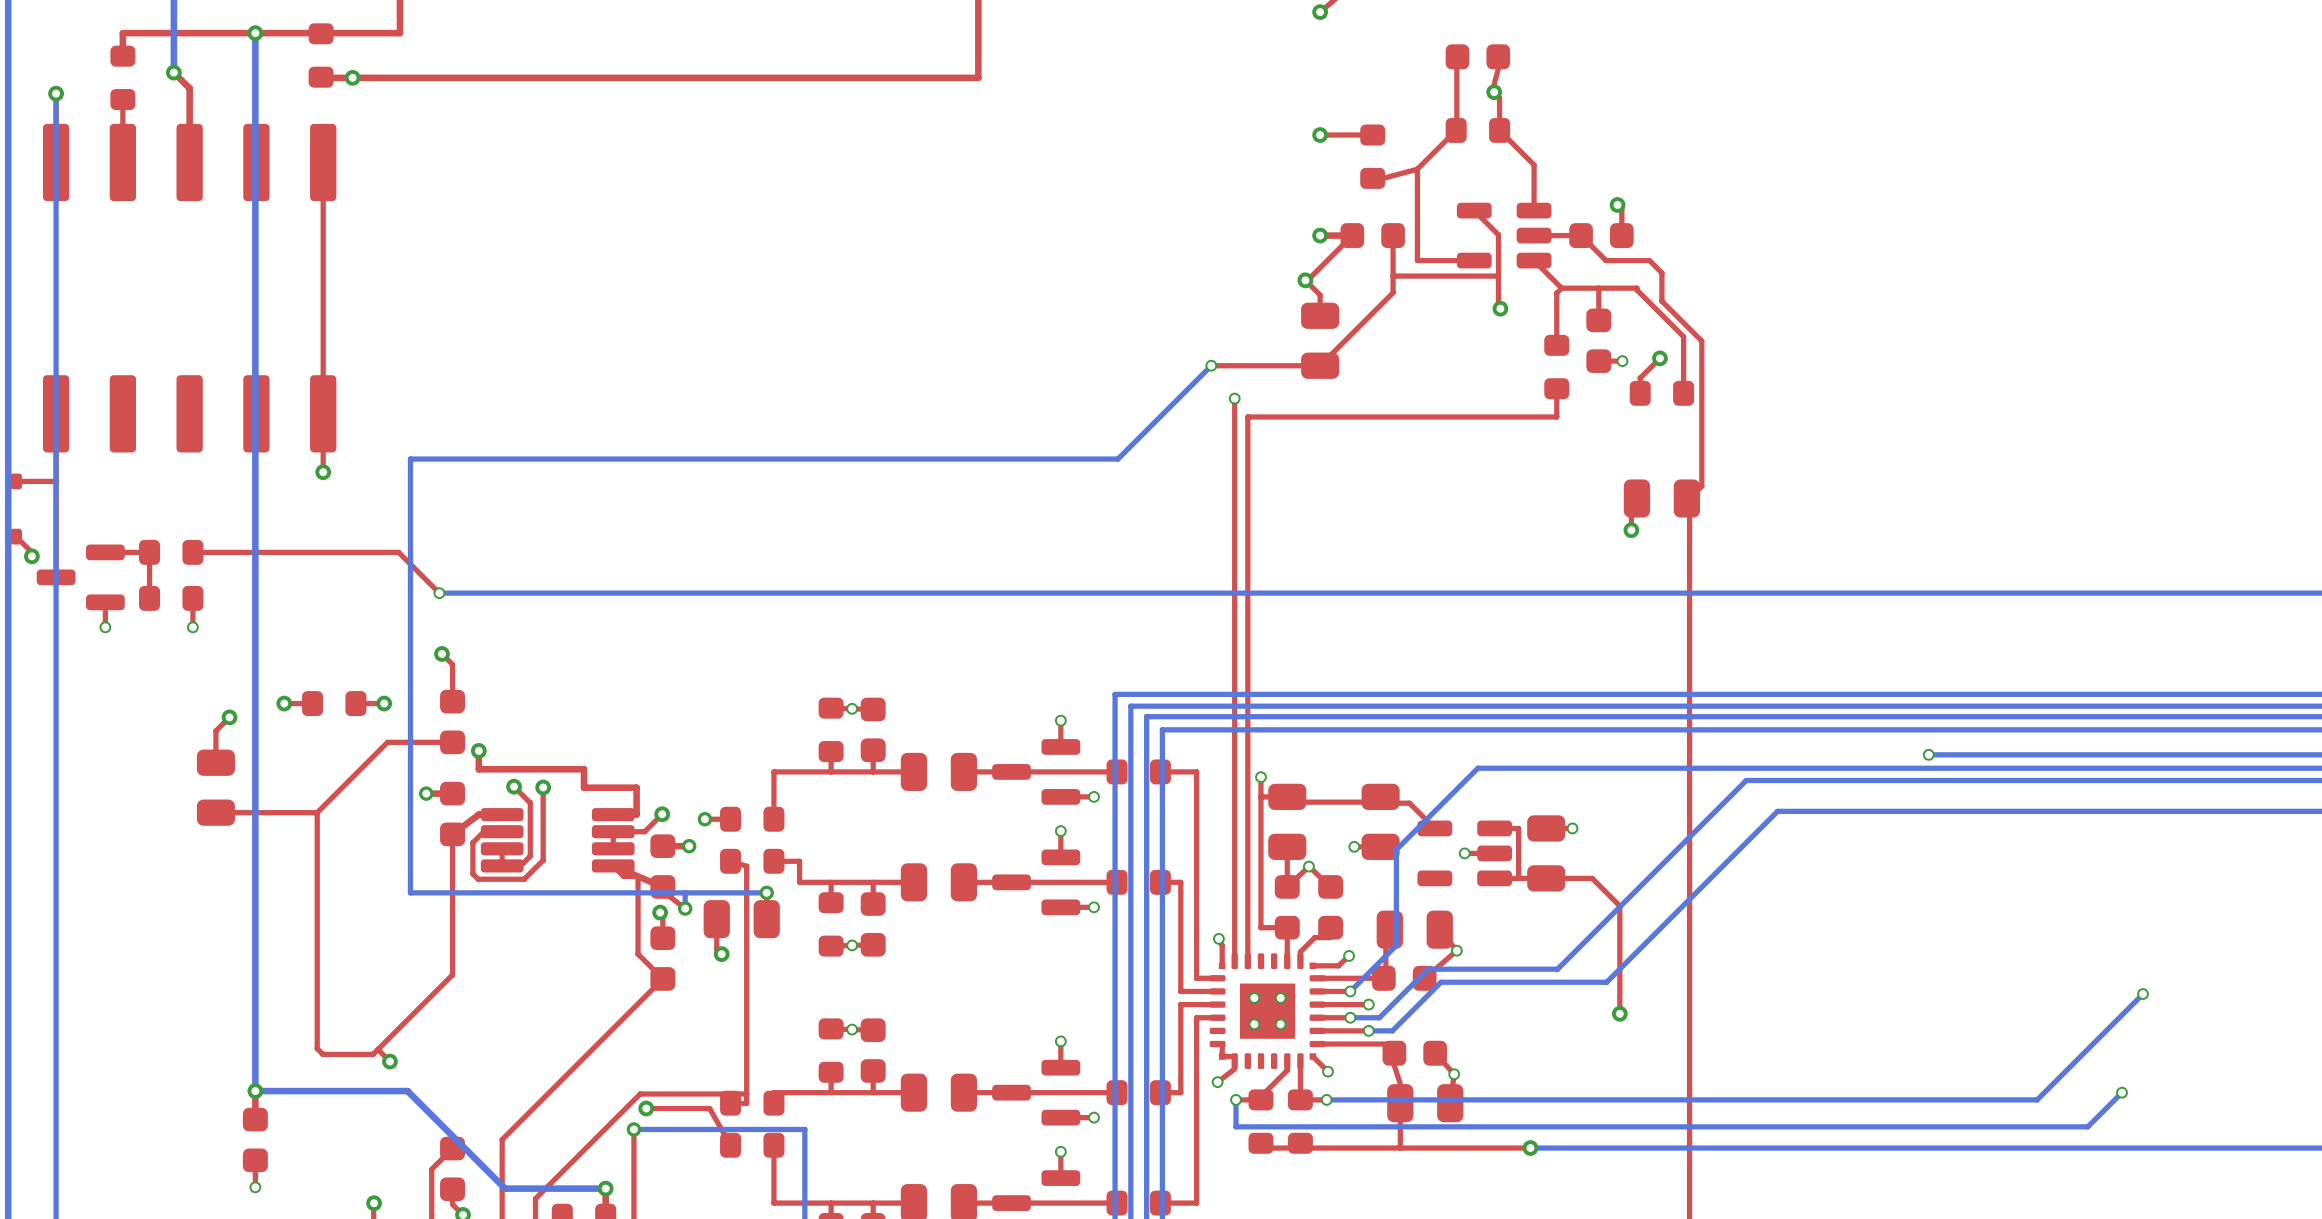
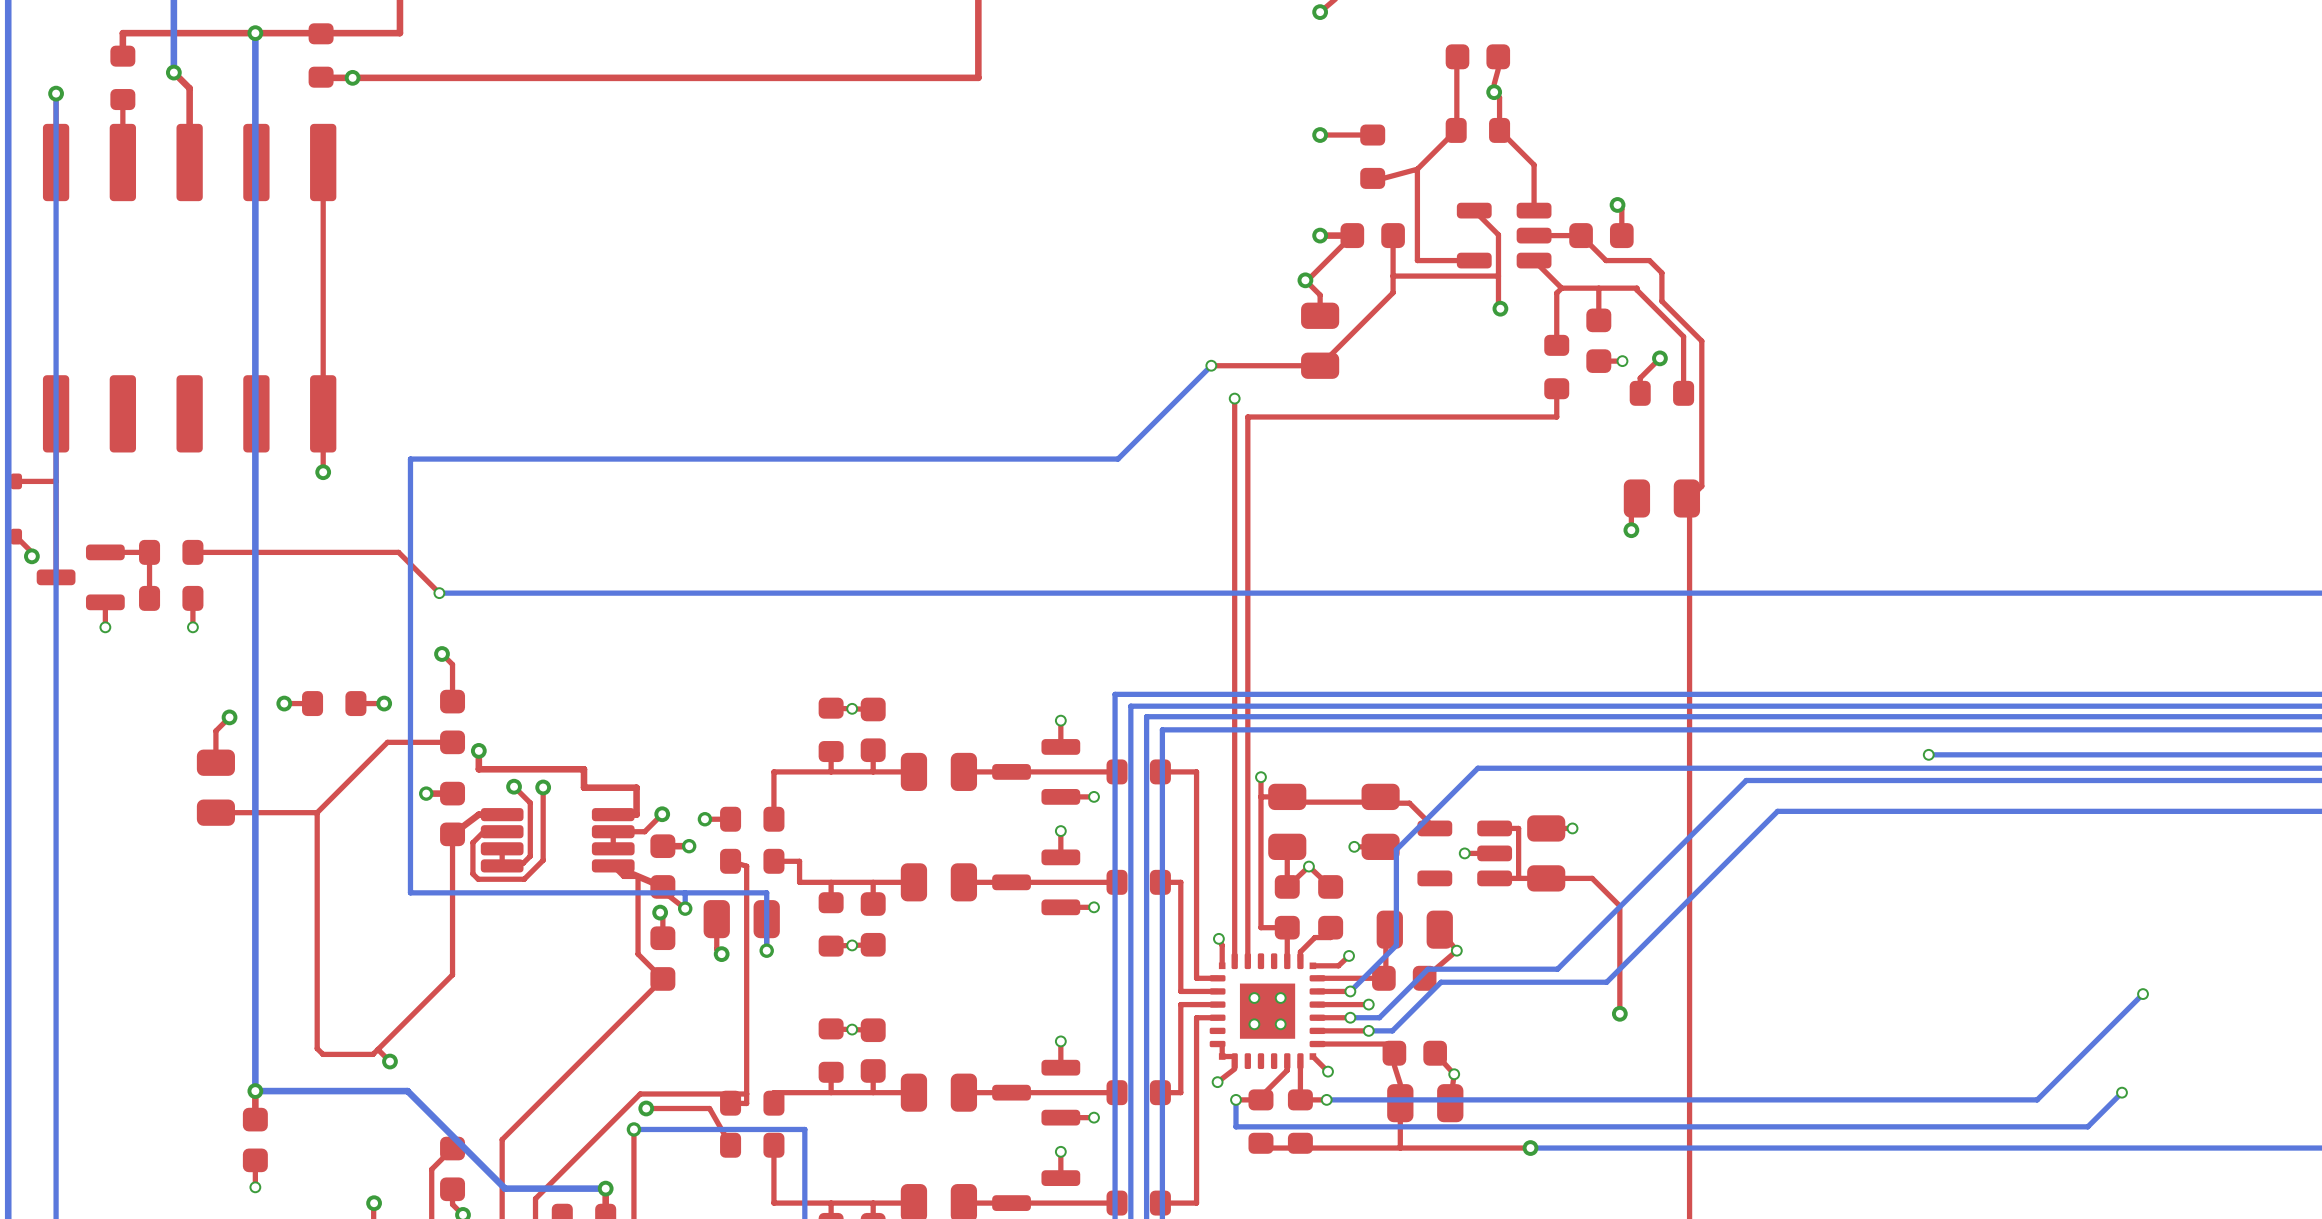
bottom track: none -> (766, 892) (766, 950)
via position: (766, 892) -> (766, 950)

